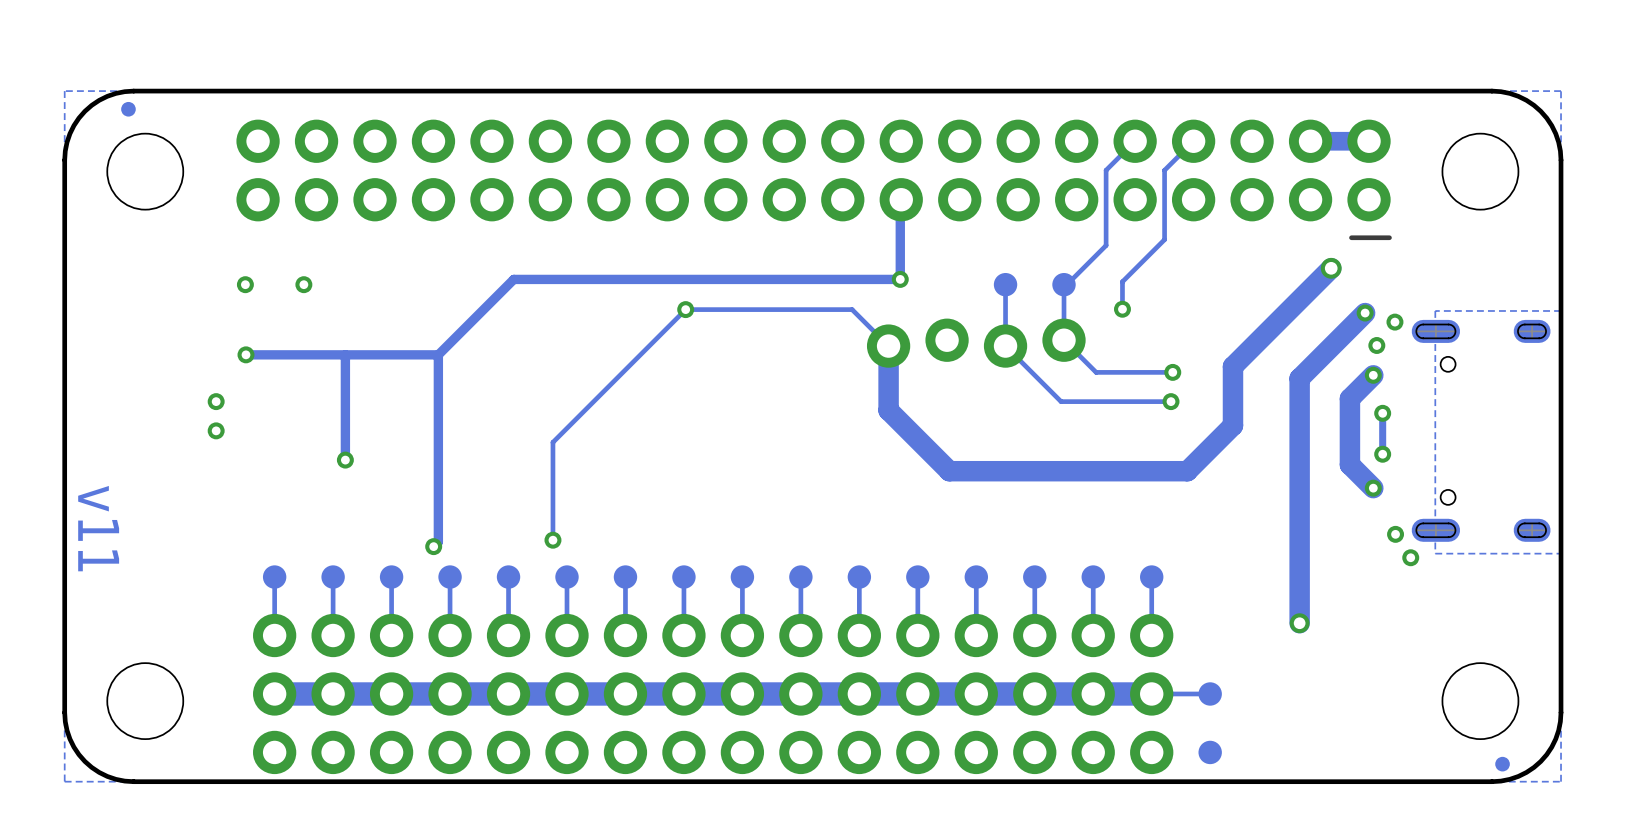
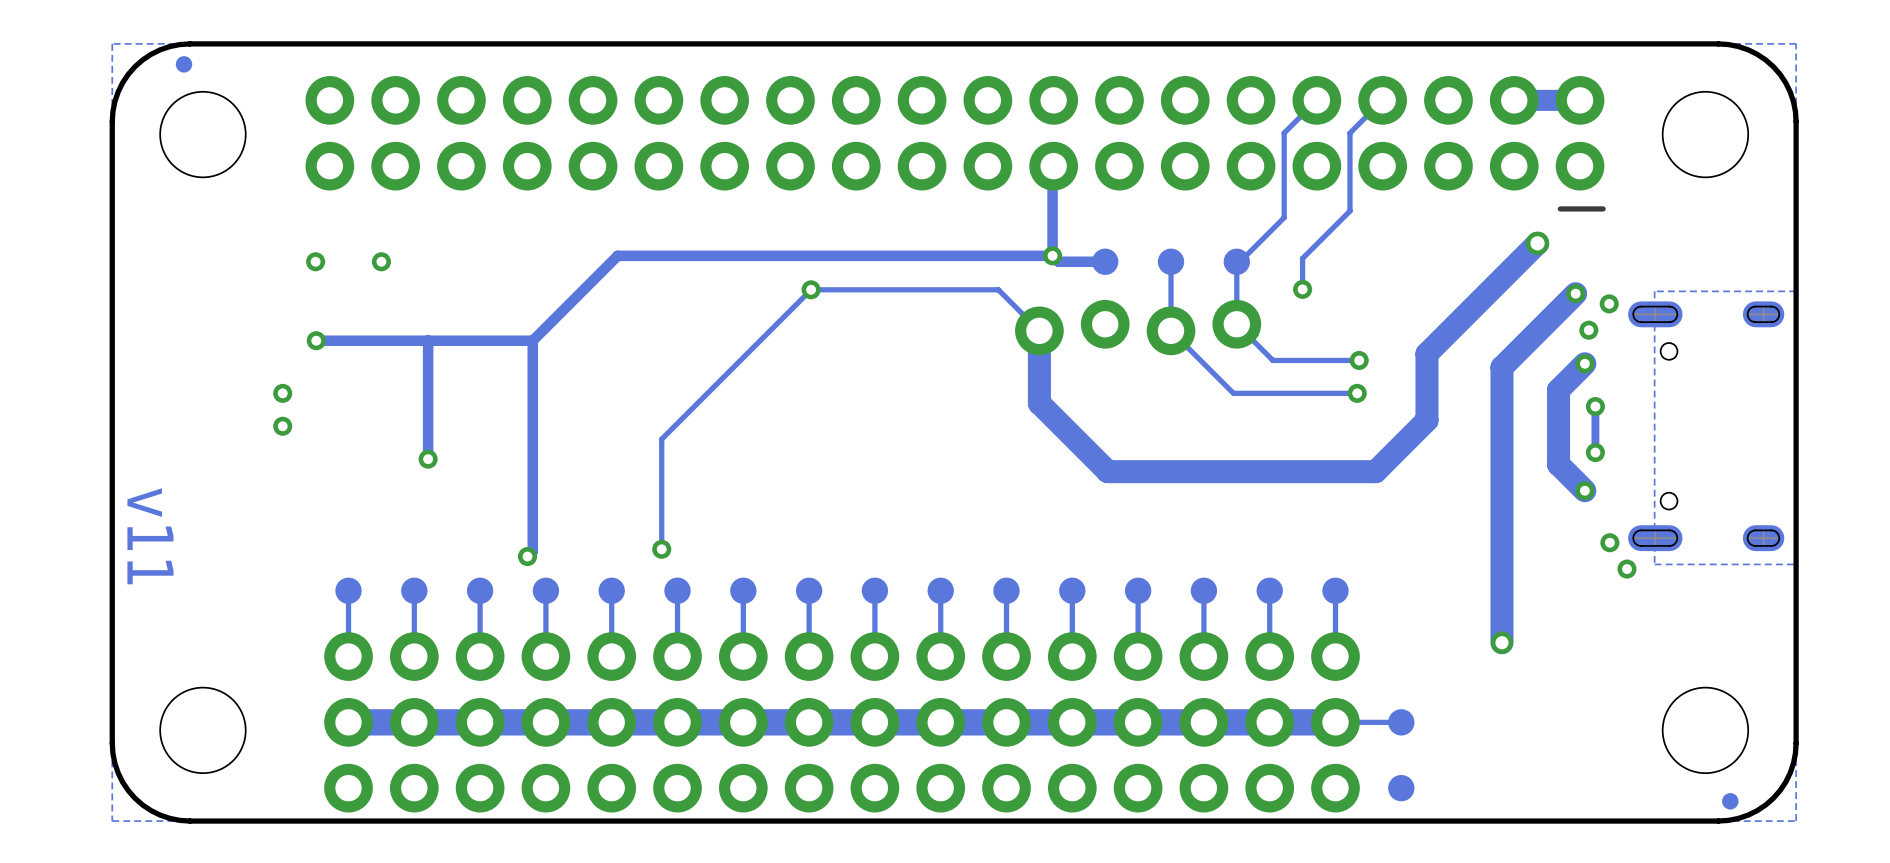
track: none -> (1052, 255) (1058, 261) (1105, 261)
part: none -> (1105, 261)

